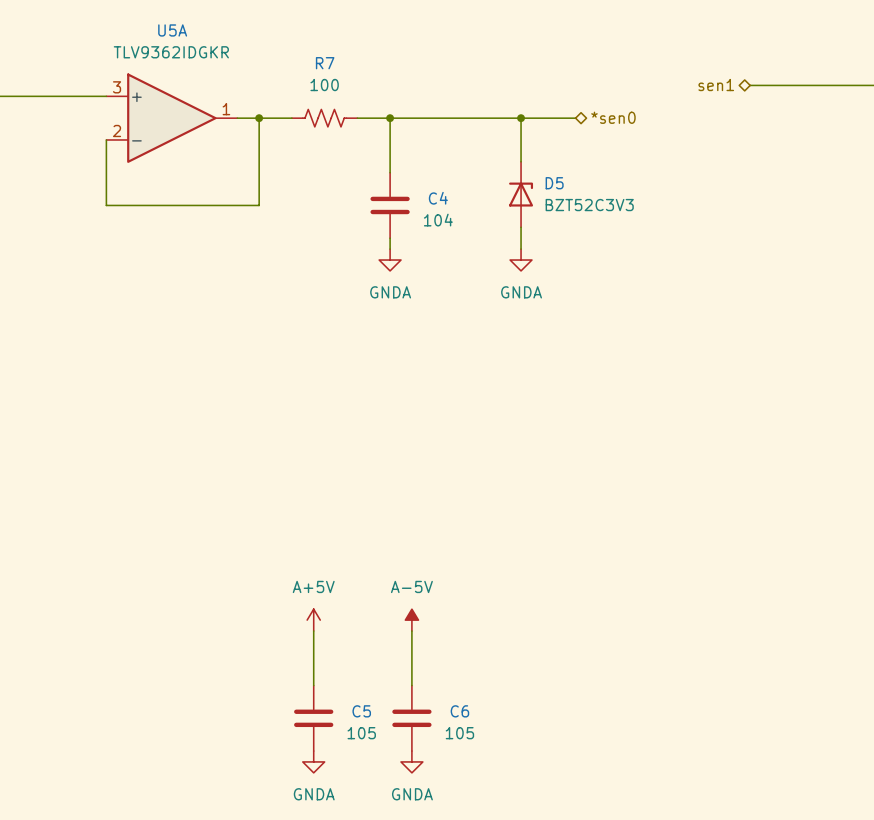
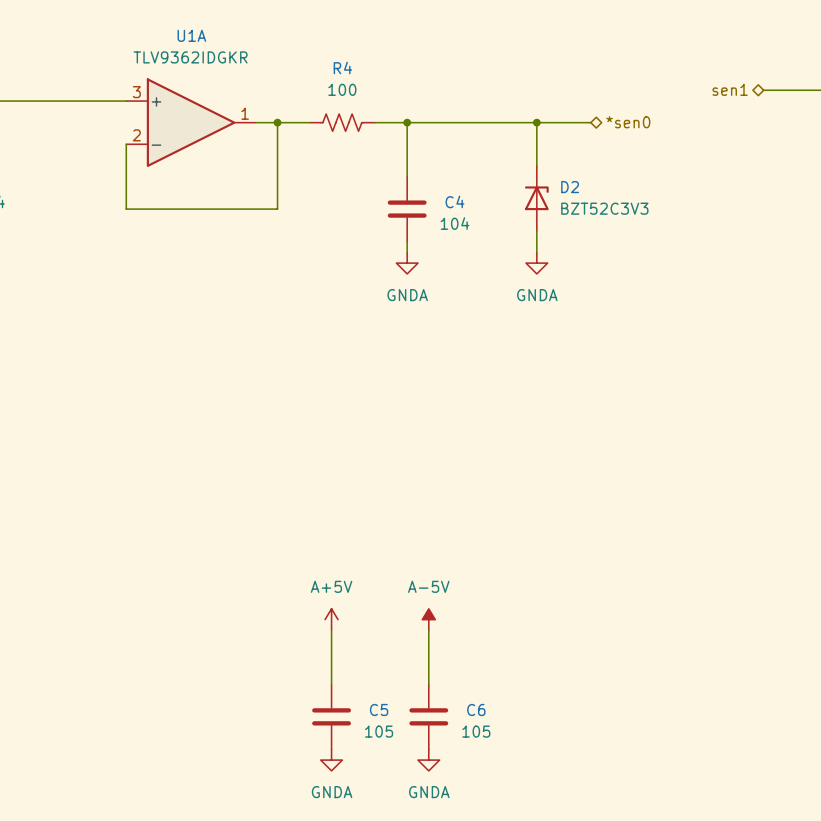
U5A name: U5A (172, 30) -> U1A (191, 35)
R7 name: R7 (325, 63) -> R4 (342, 67)
D5 name: D5 (554, 183) -> D2 (570, 187)

